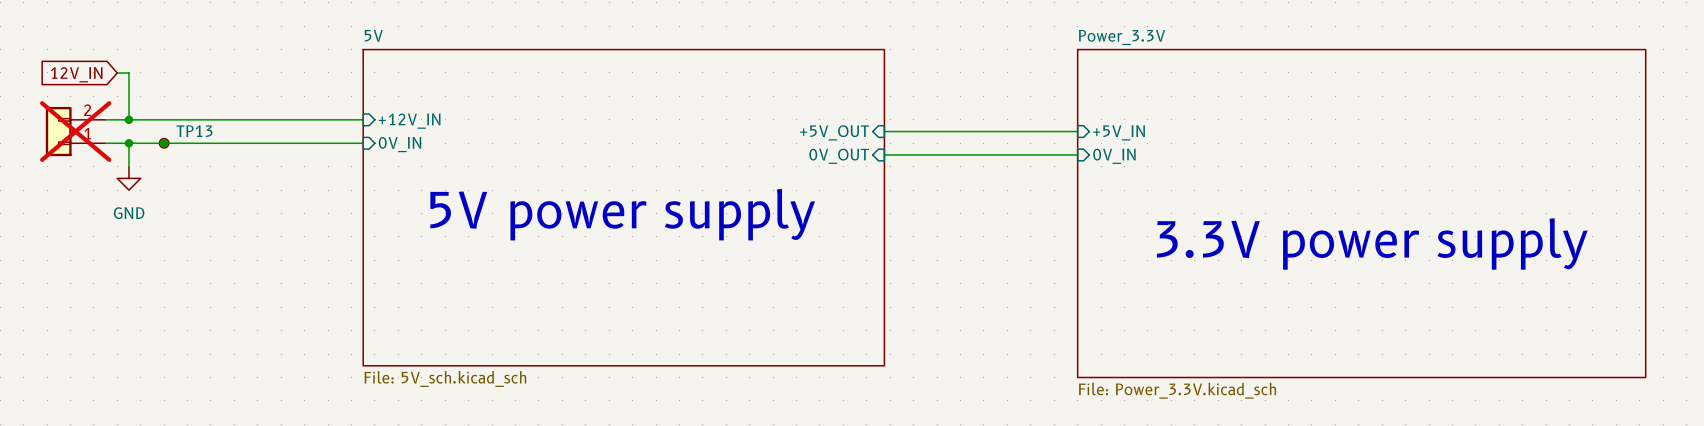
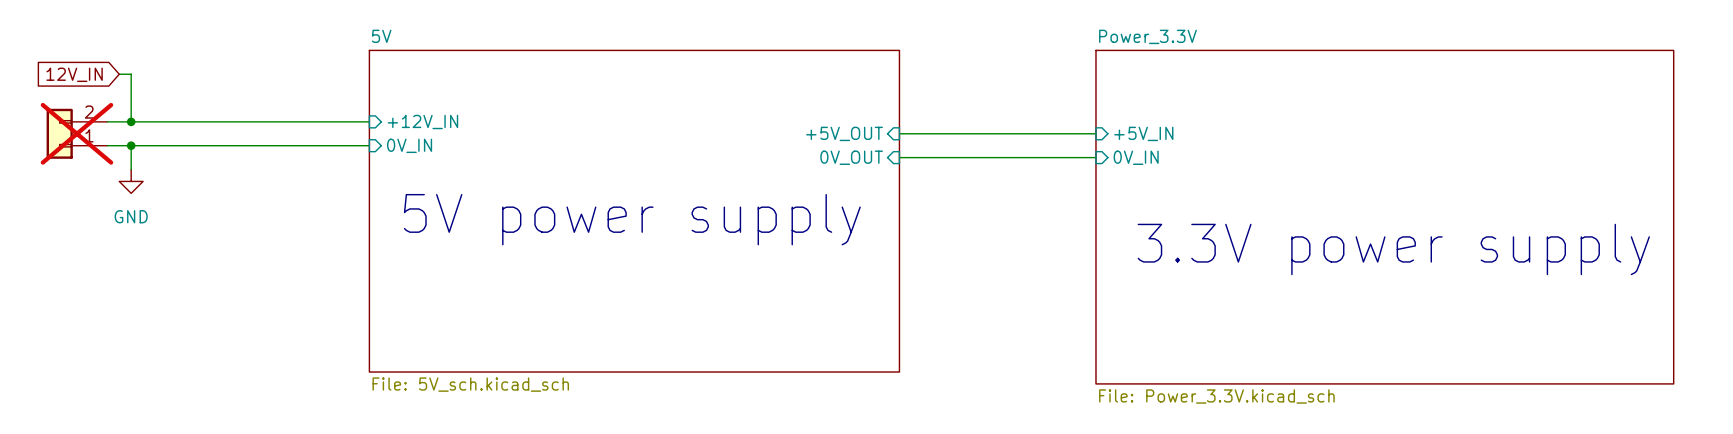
junction: (164, 143) -> none
TP13: (164, 143) -> none

